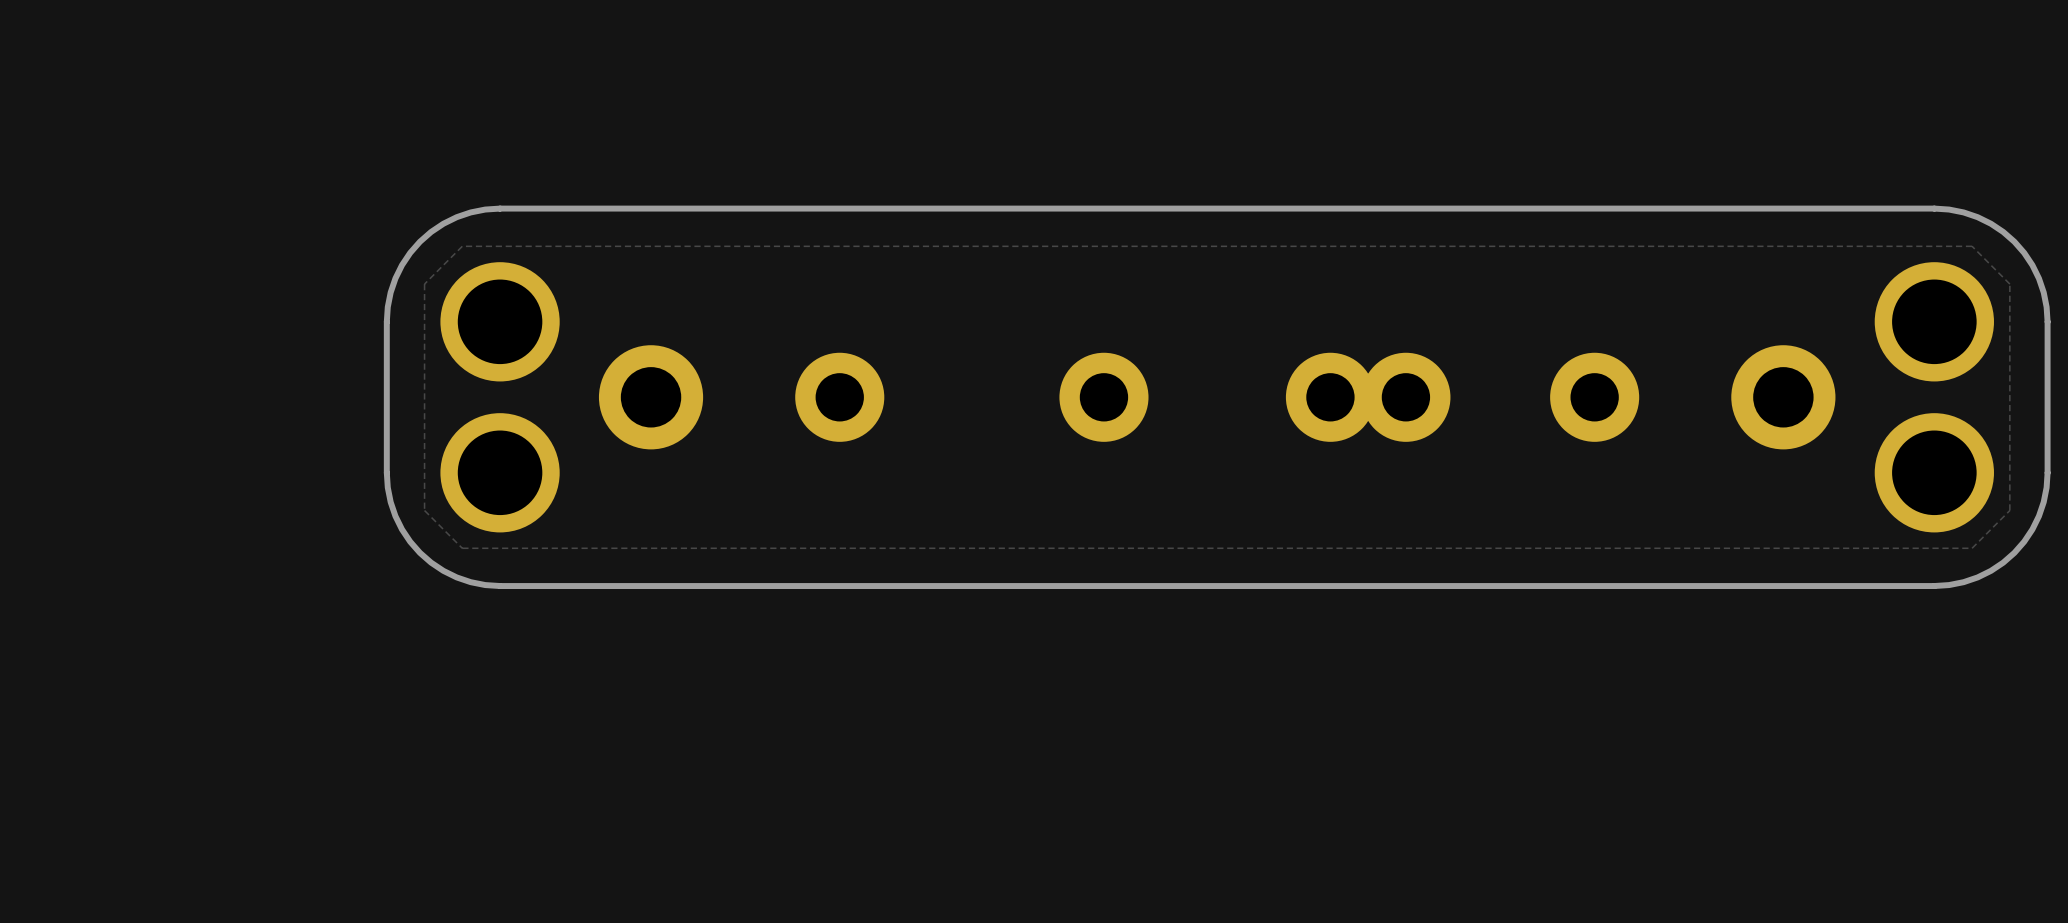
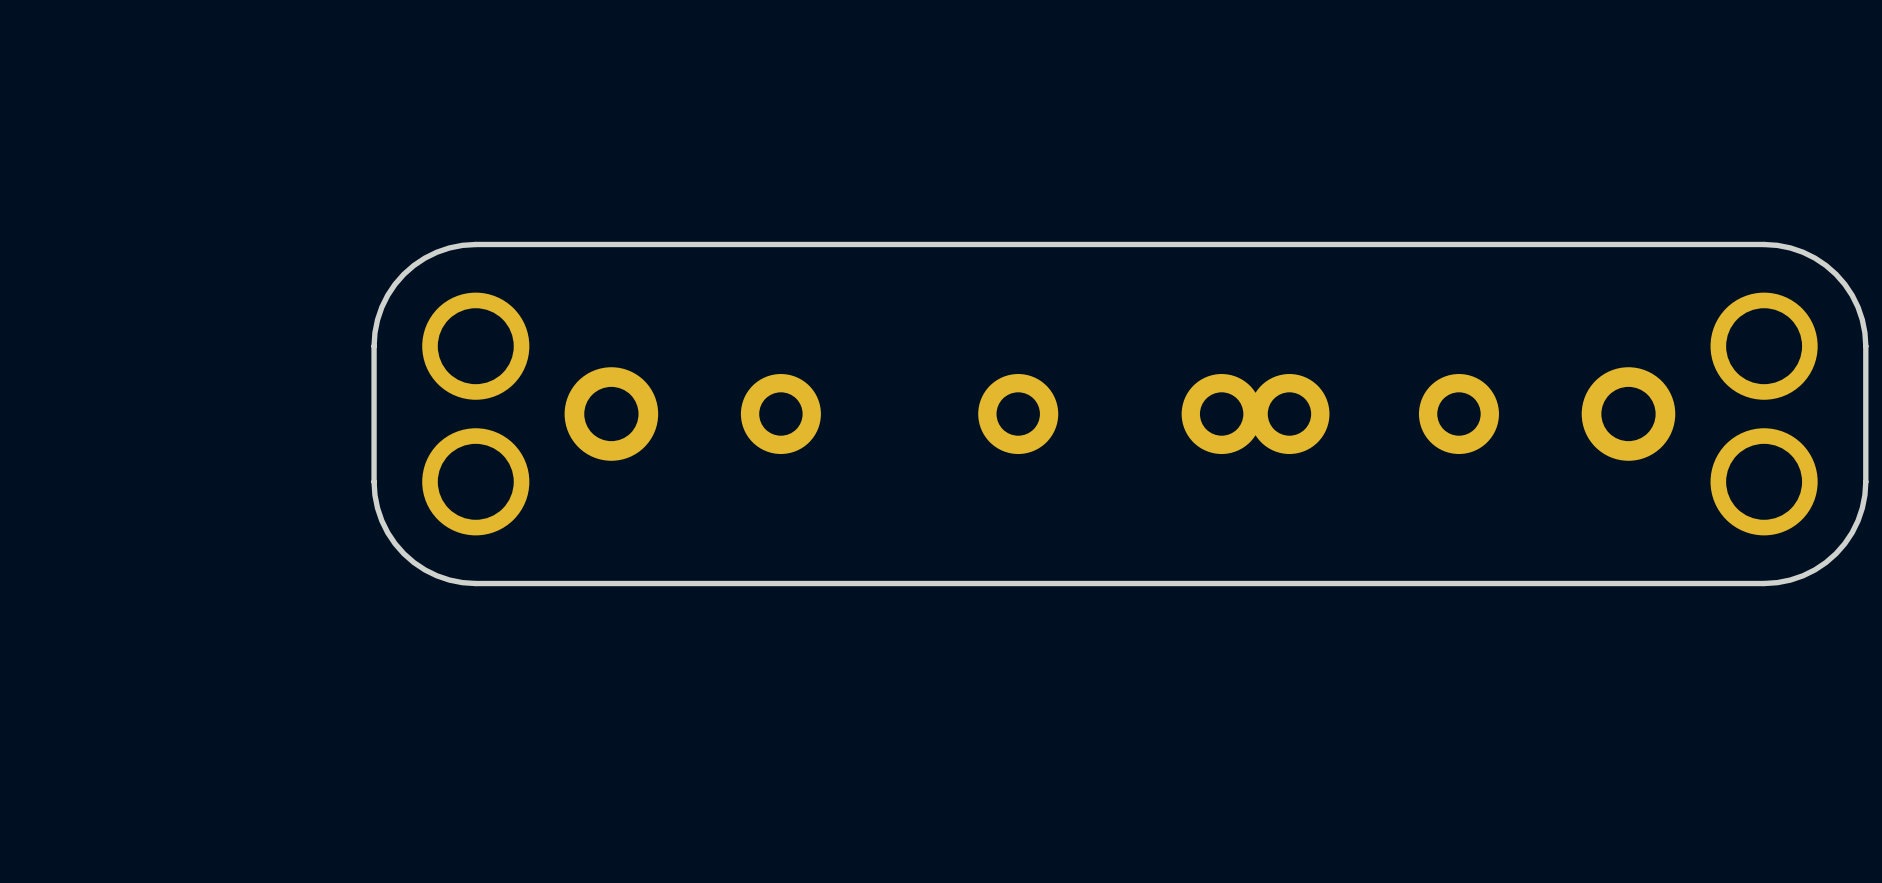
zone outline: (1972, 246) (2009, 284) (2009, 510) (1972, 548) (462, 548) (424, 510) (424, 284) (462, 246) (1972, 246) -> none

